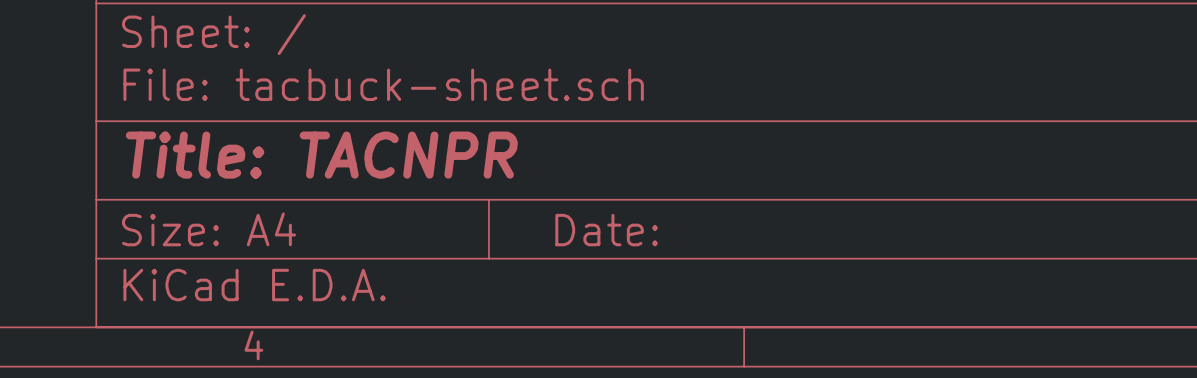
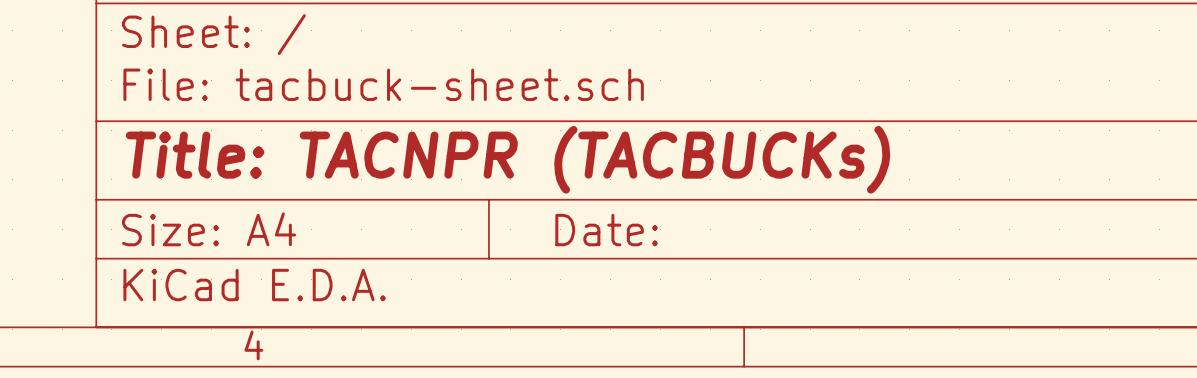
title block: Title: TACNPR (321, 155) -> Title: TACNPR (TACBUCKs) (508, 159)

